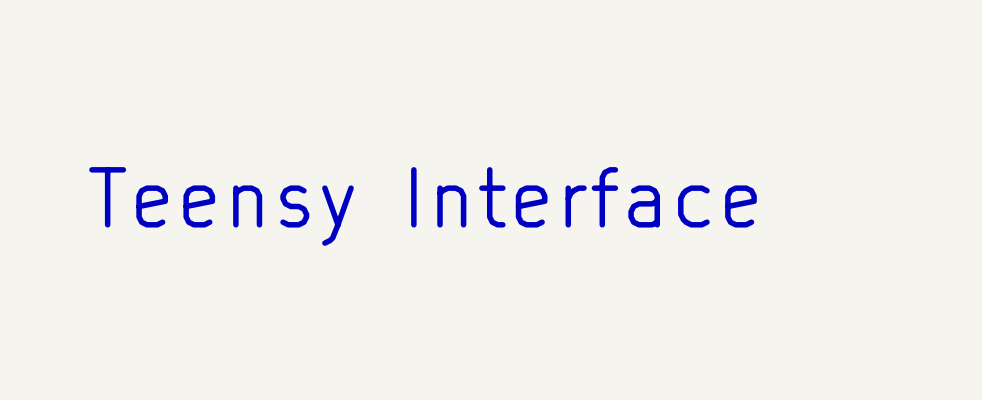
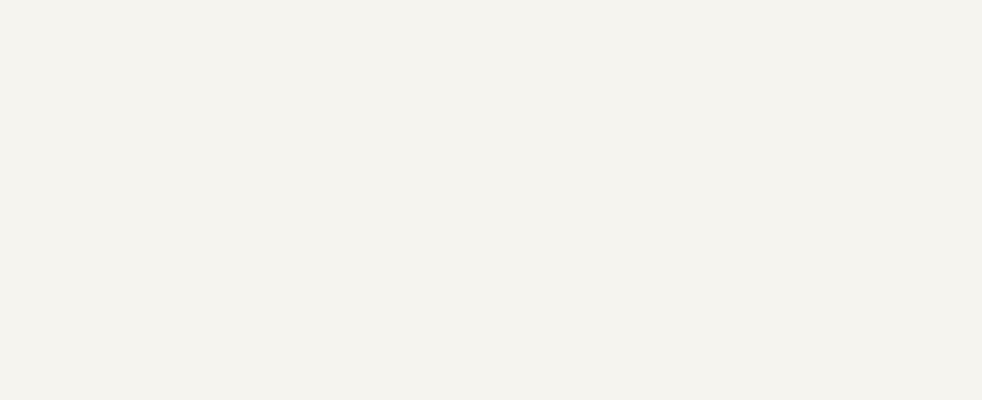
text: Teensy Interface (423, 206) -> none

